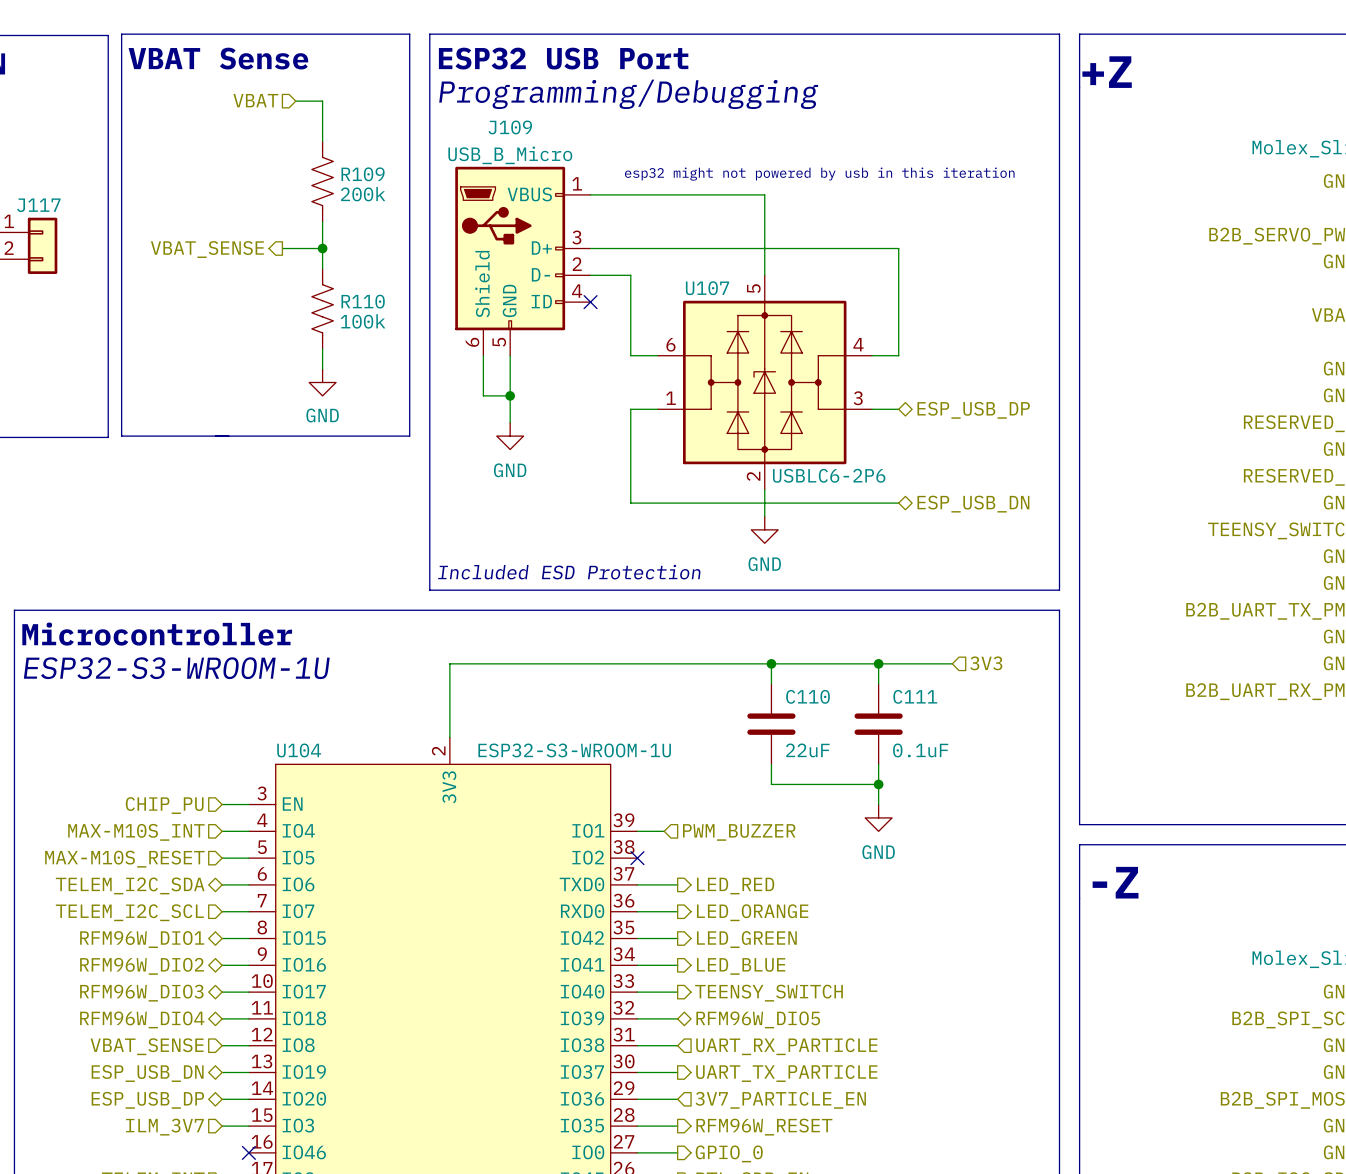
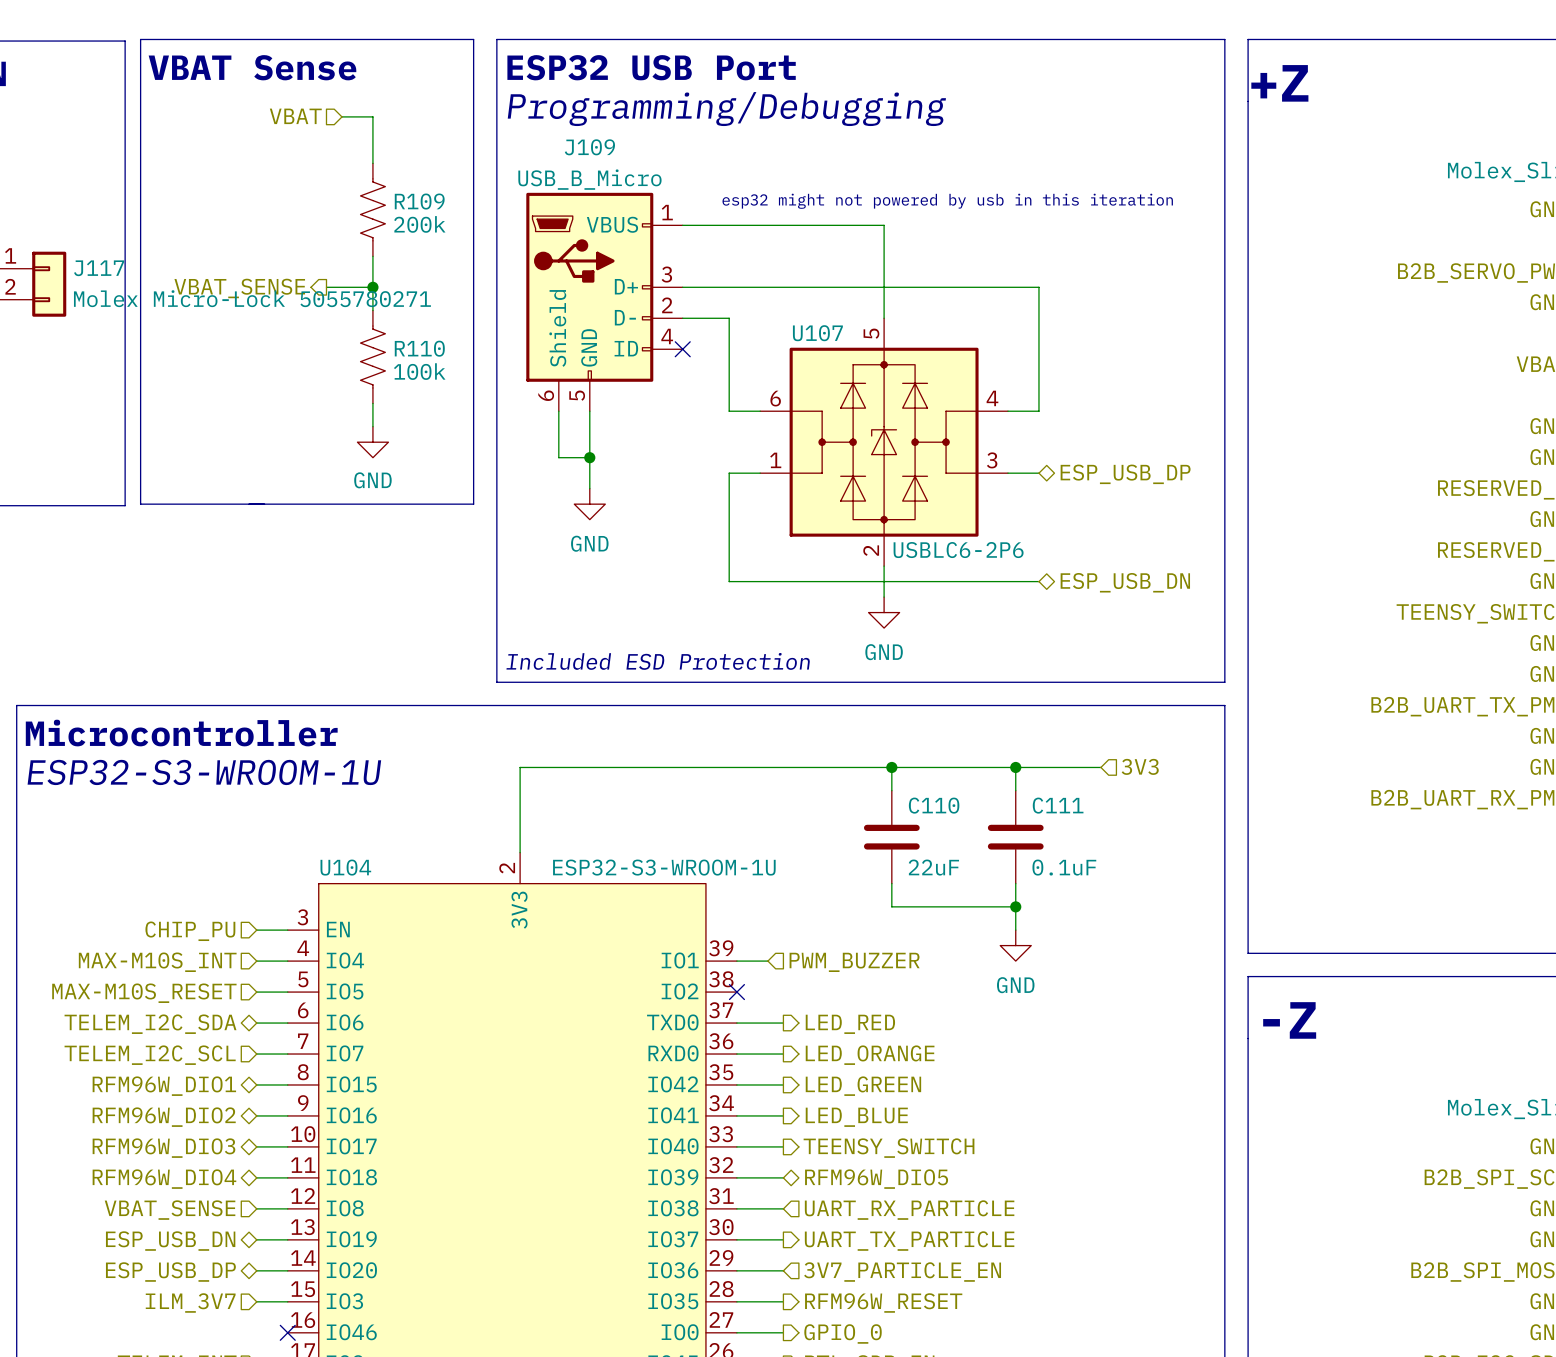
J117 name position: J117 (38, 205) -> J117 (99, 268)
J117 value: none -> Molex Micro-Lock 5055780271 (252, 298)

